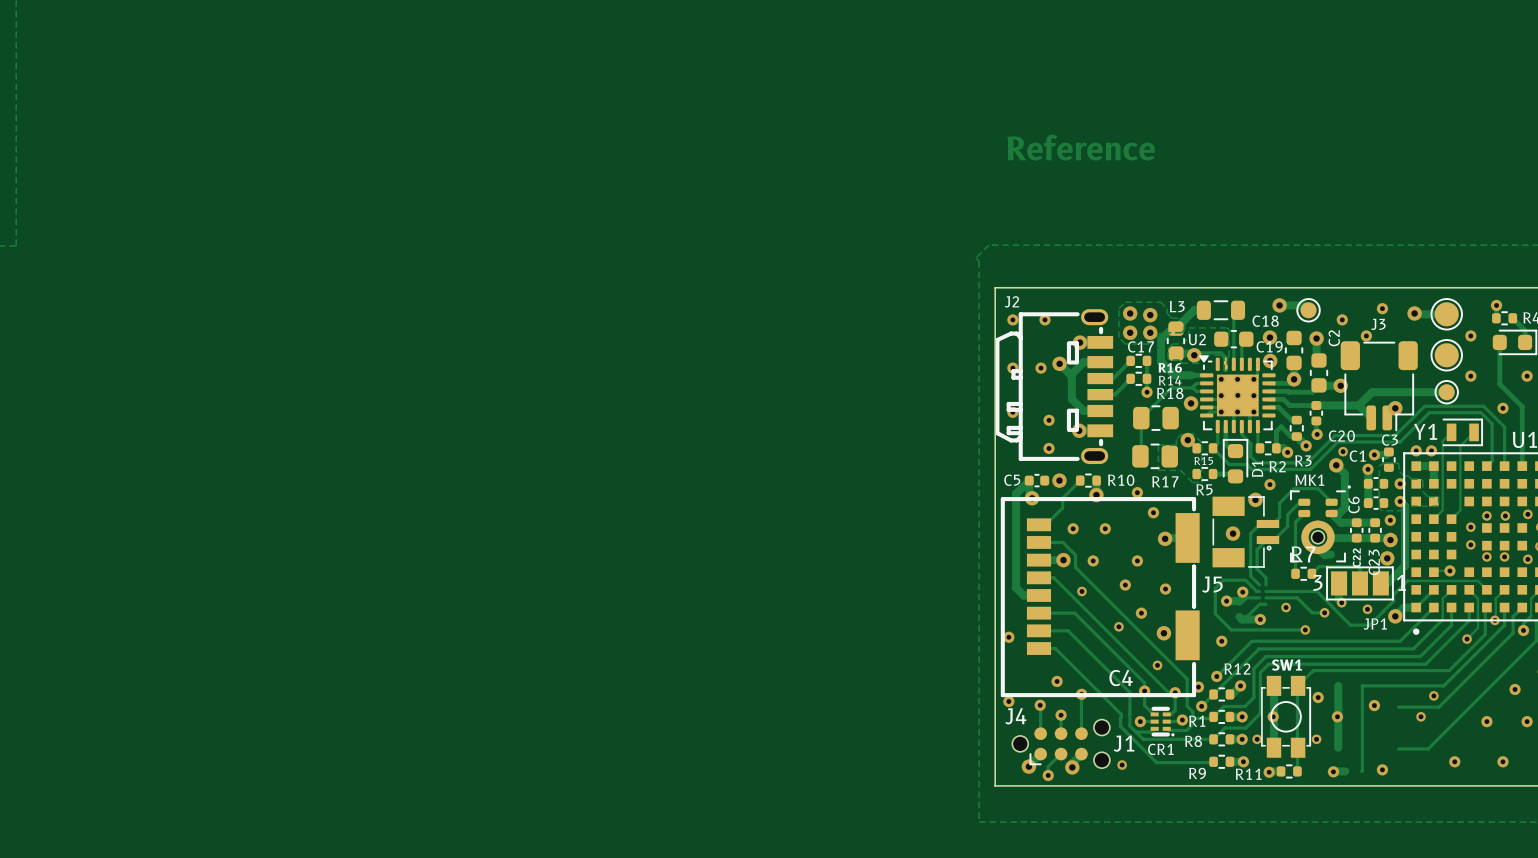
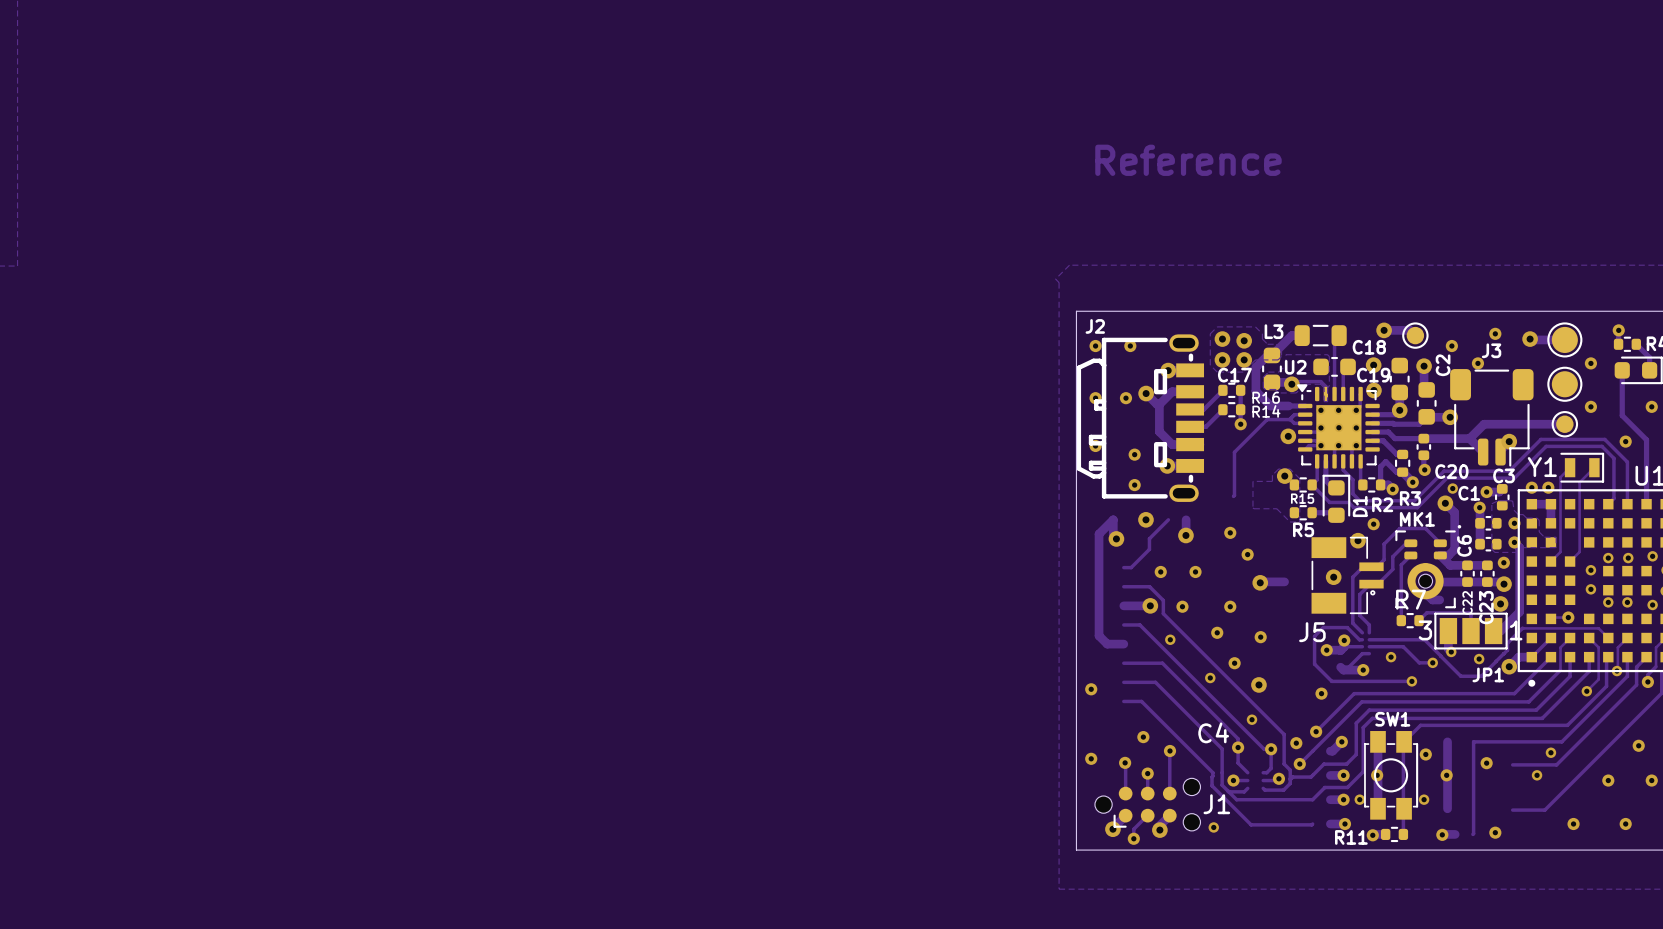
R18: (1155, 418) -> none
R17: (1155, 456) -> none
C5: (1036, 480) -> none
R10: (1088, 480) -> none
J4: (1100, 597) -> none
R12: (1221, 694) -> none
R1: (1221, 716) -> none
CR1: (1162, 721) -> none
R8: (1221, 739) -> none
R9: (1221, 761) -> none

